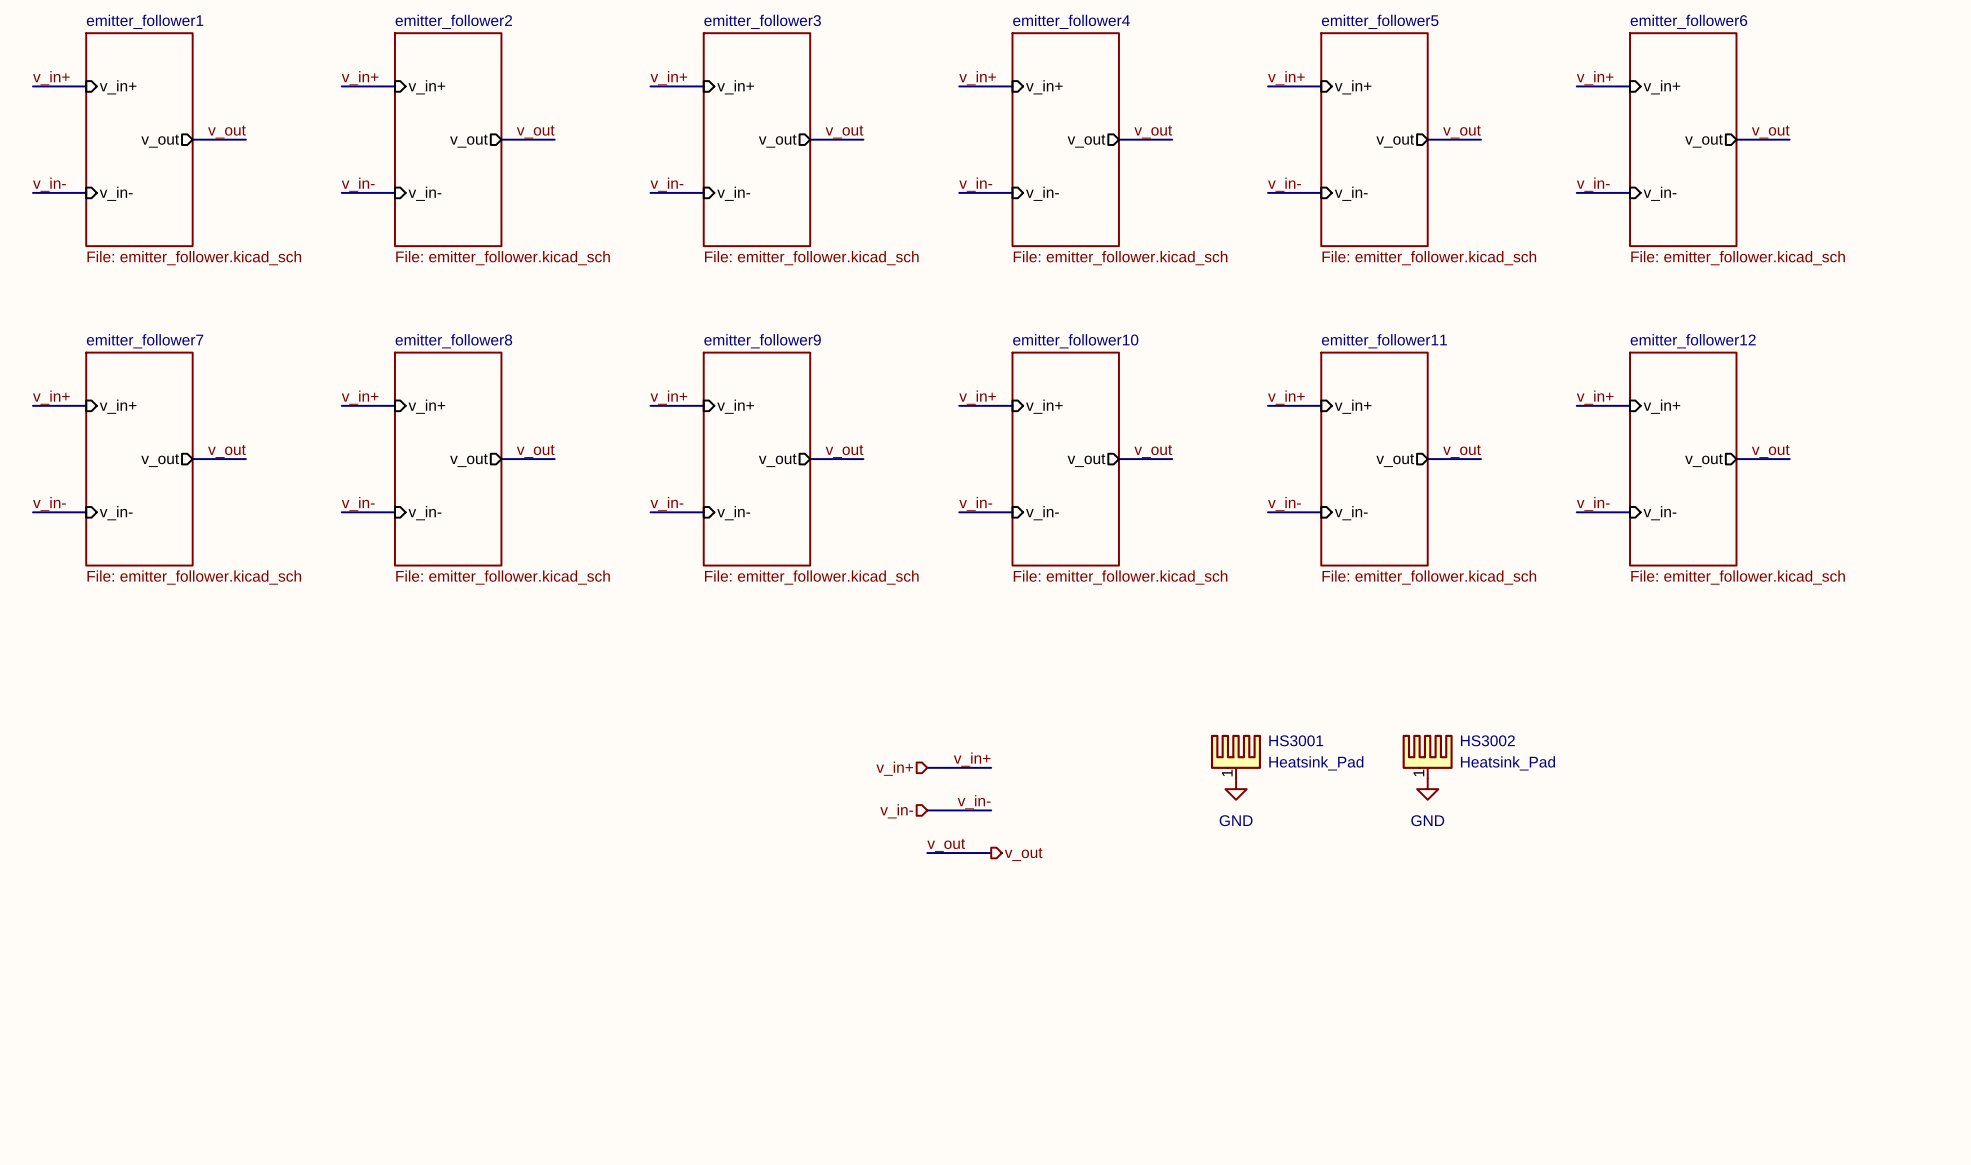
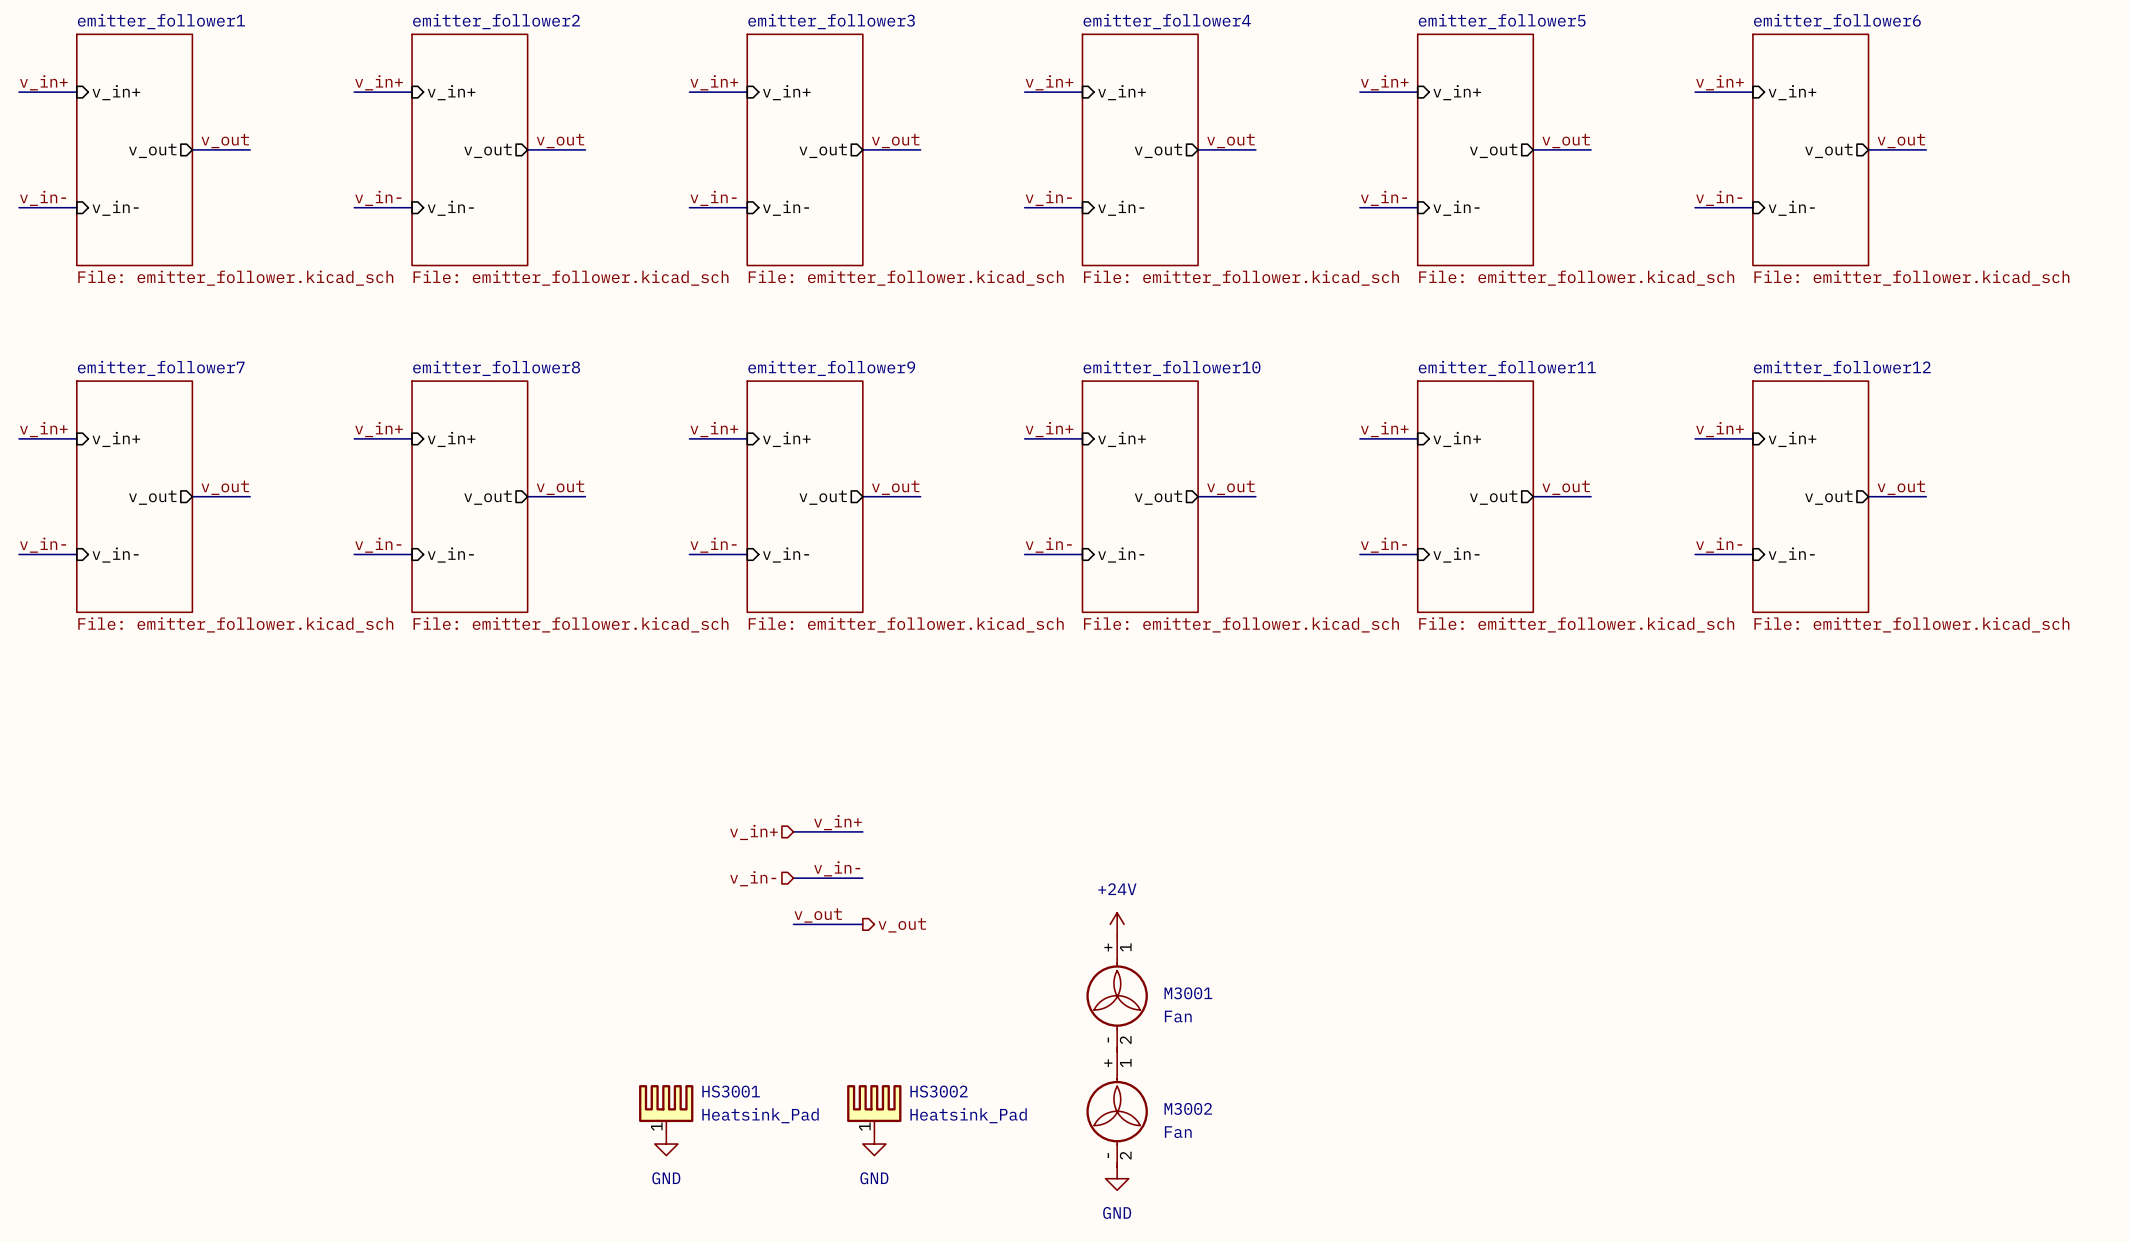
HS3001 position: (1235, 756) -> (666, 1108)
HS3002 position: (1427, 756) -> (874, 1108)
label position: v_in+ (972, 759) -> v_in+ (838, 822)
wire: (927, 767) (991, 767) -> (793, 831) (862, 831)
hierarchical label position: v_in+ (894, 768) -> v_in+ (753, 832)
power symbol: GND (1236, 789) -> none
power symbol: GND (1427, 789) -> none
label position: v_in- (974, 802) -> v_in- (837, 868)
wire: (927, 810) (991, 810) -> (793, 878) (862, 878)
hierarchical label position: v_in- (896, 811) -> v_in- (753, 878)
label position: v_out (946, 845) -> v_out (818, 915)
wire: (927, 853) (991, 853) -> (793, 924) (862, 924)
power symbol: none -> +24V (1117, 924)
hierarchical label position: v_out (1023, 854) -> v_out (902, 925)
M3001: none -> Fan (1117, 993)
M3002: none -> Fan (1117, 1109)
power symbol: none -> GND (666, 1144)
power symbol: none -> GND (874, 1144)
power symbol: none -> GND (1117, 1178)

